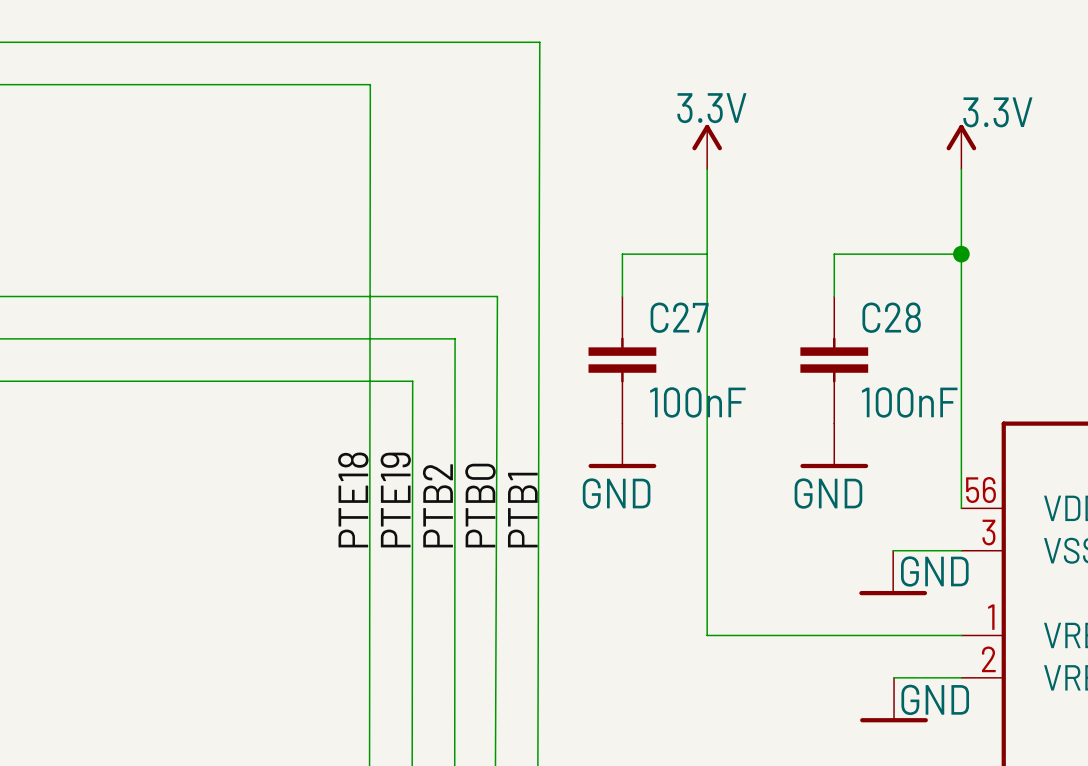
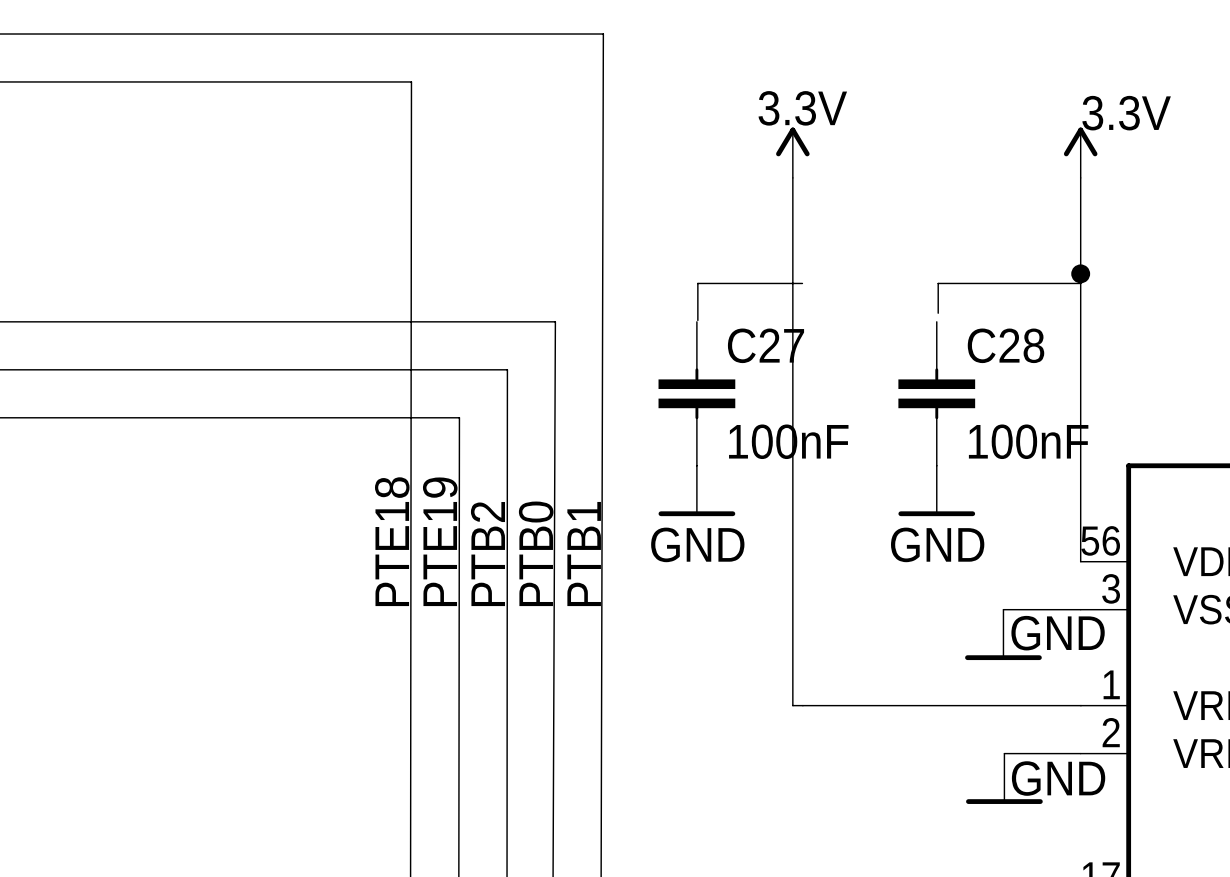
wire: (707, 254) (622, 254) (622, 296) -> none
wire: (961, 254) (834, 254) (834, 296) -> none
wire: none -> (802, 283) (697, 283) (697, 320)
wire: none -> (1080, 283) (938, 283) (938, 313)

